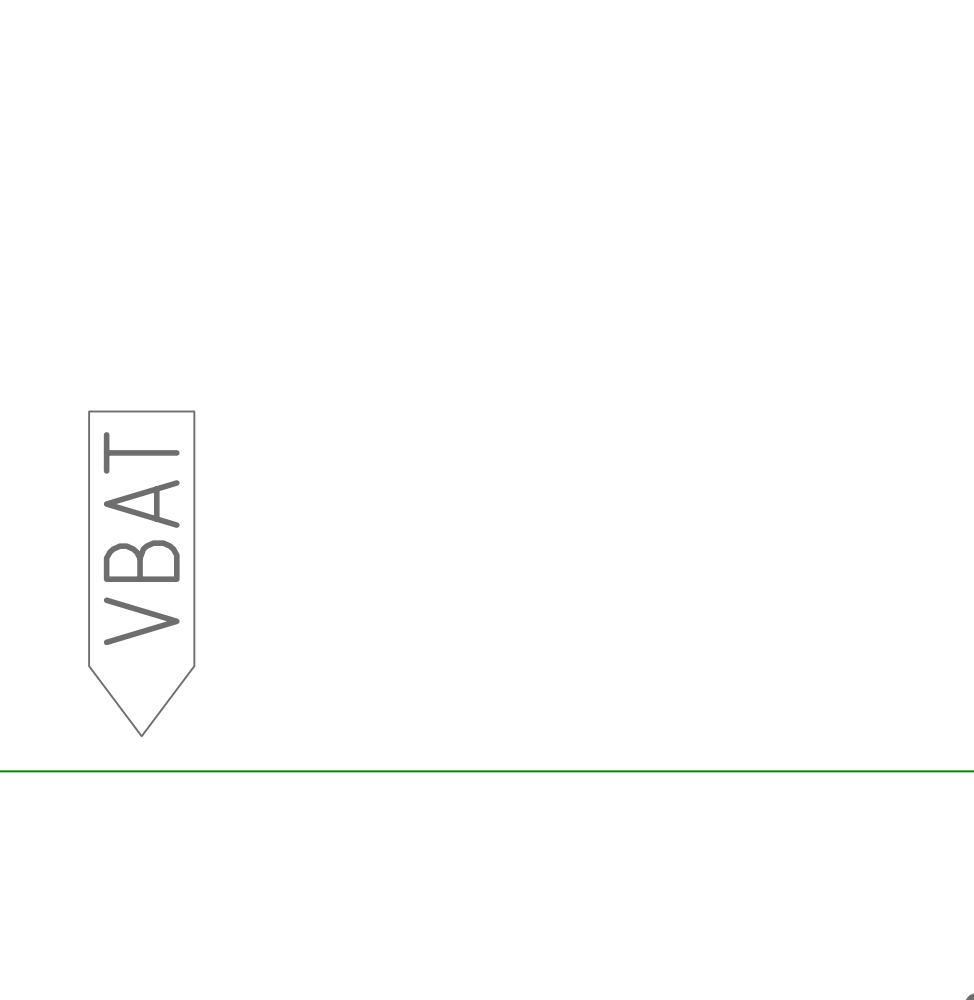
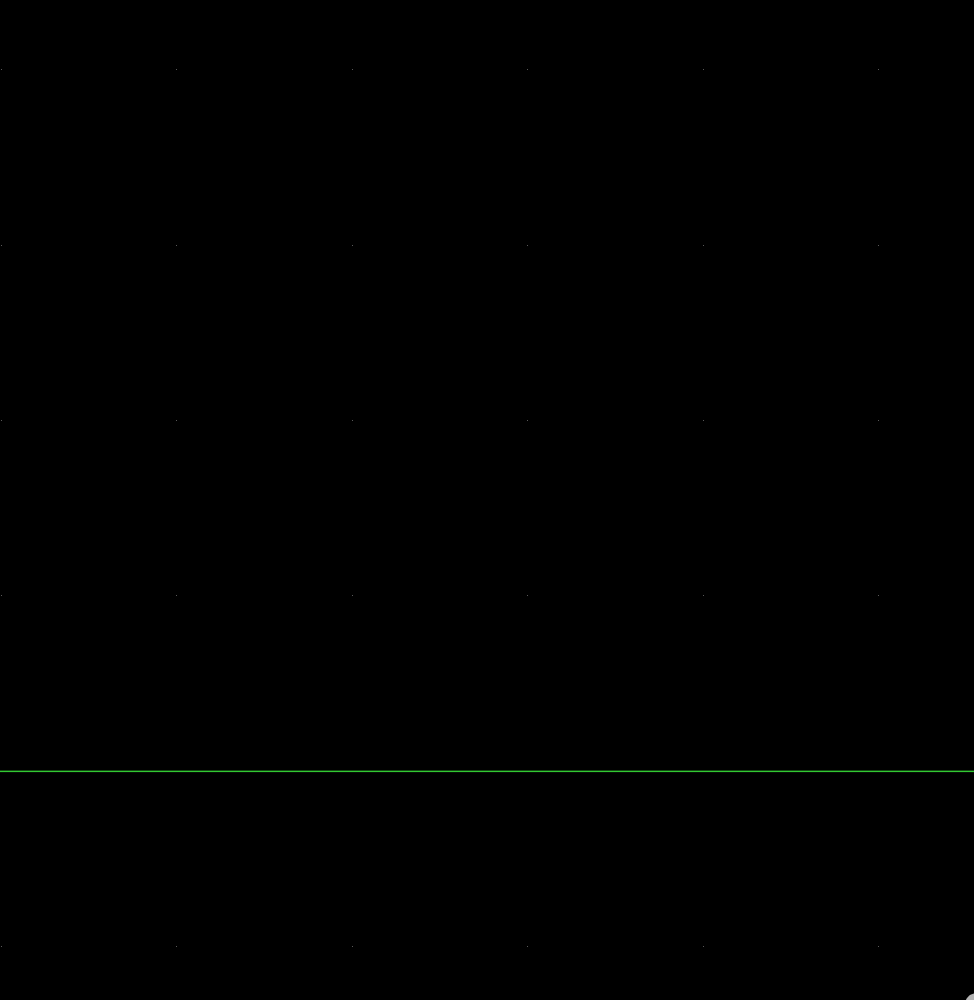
global label: VBAT (141, 538) -> none

